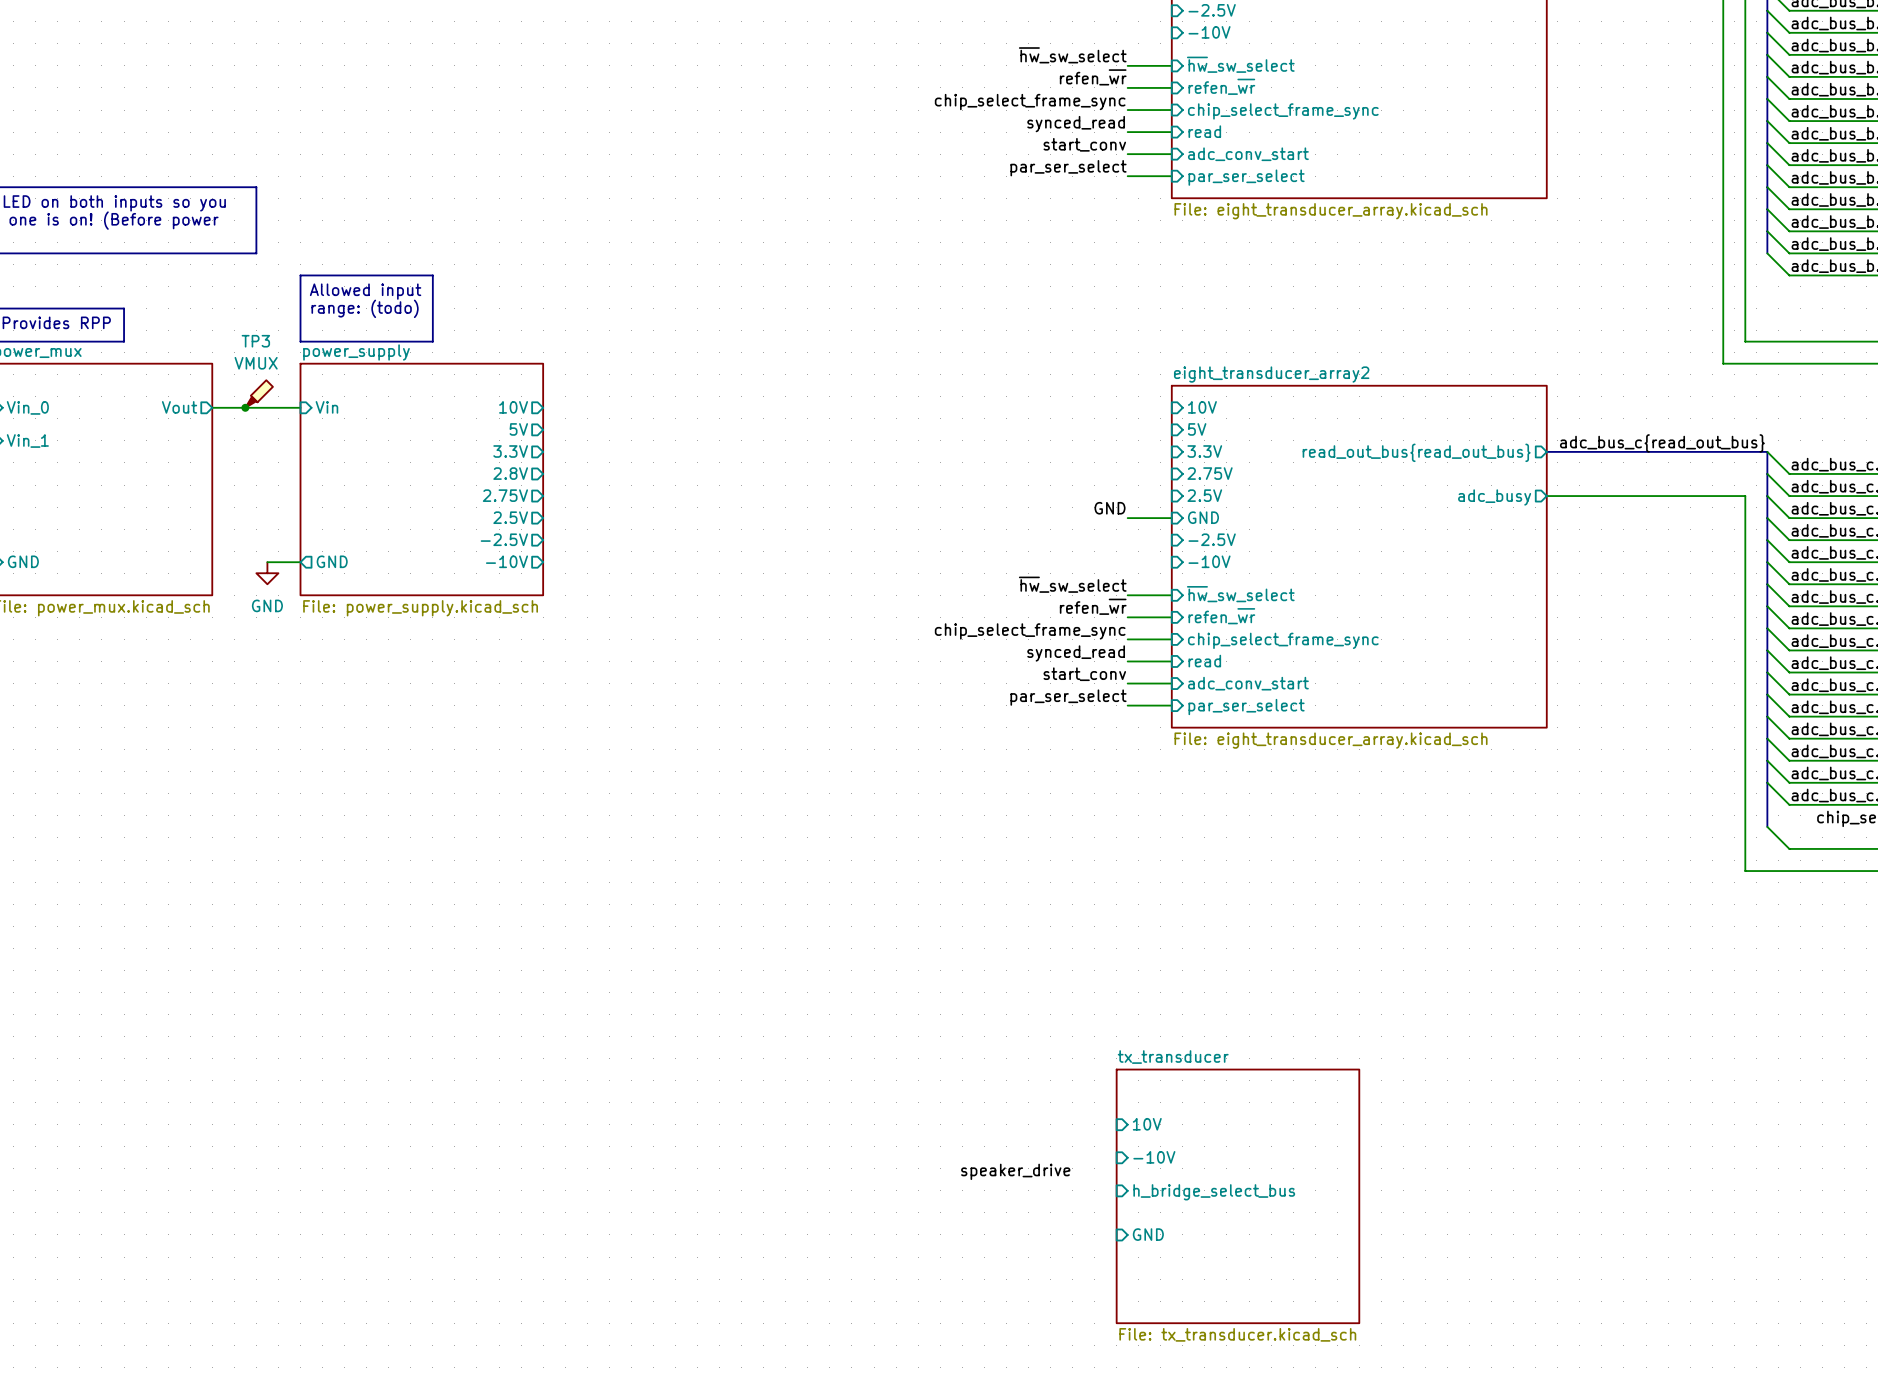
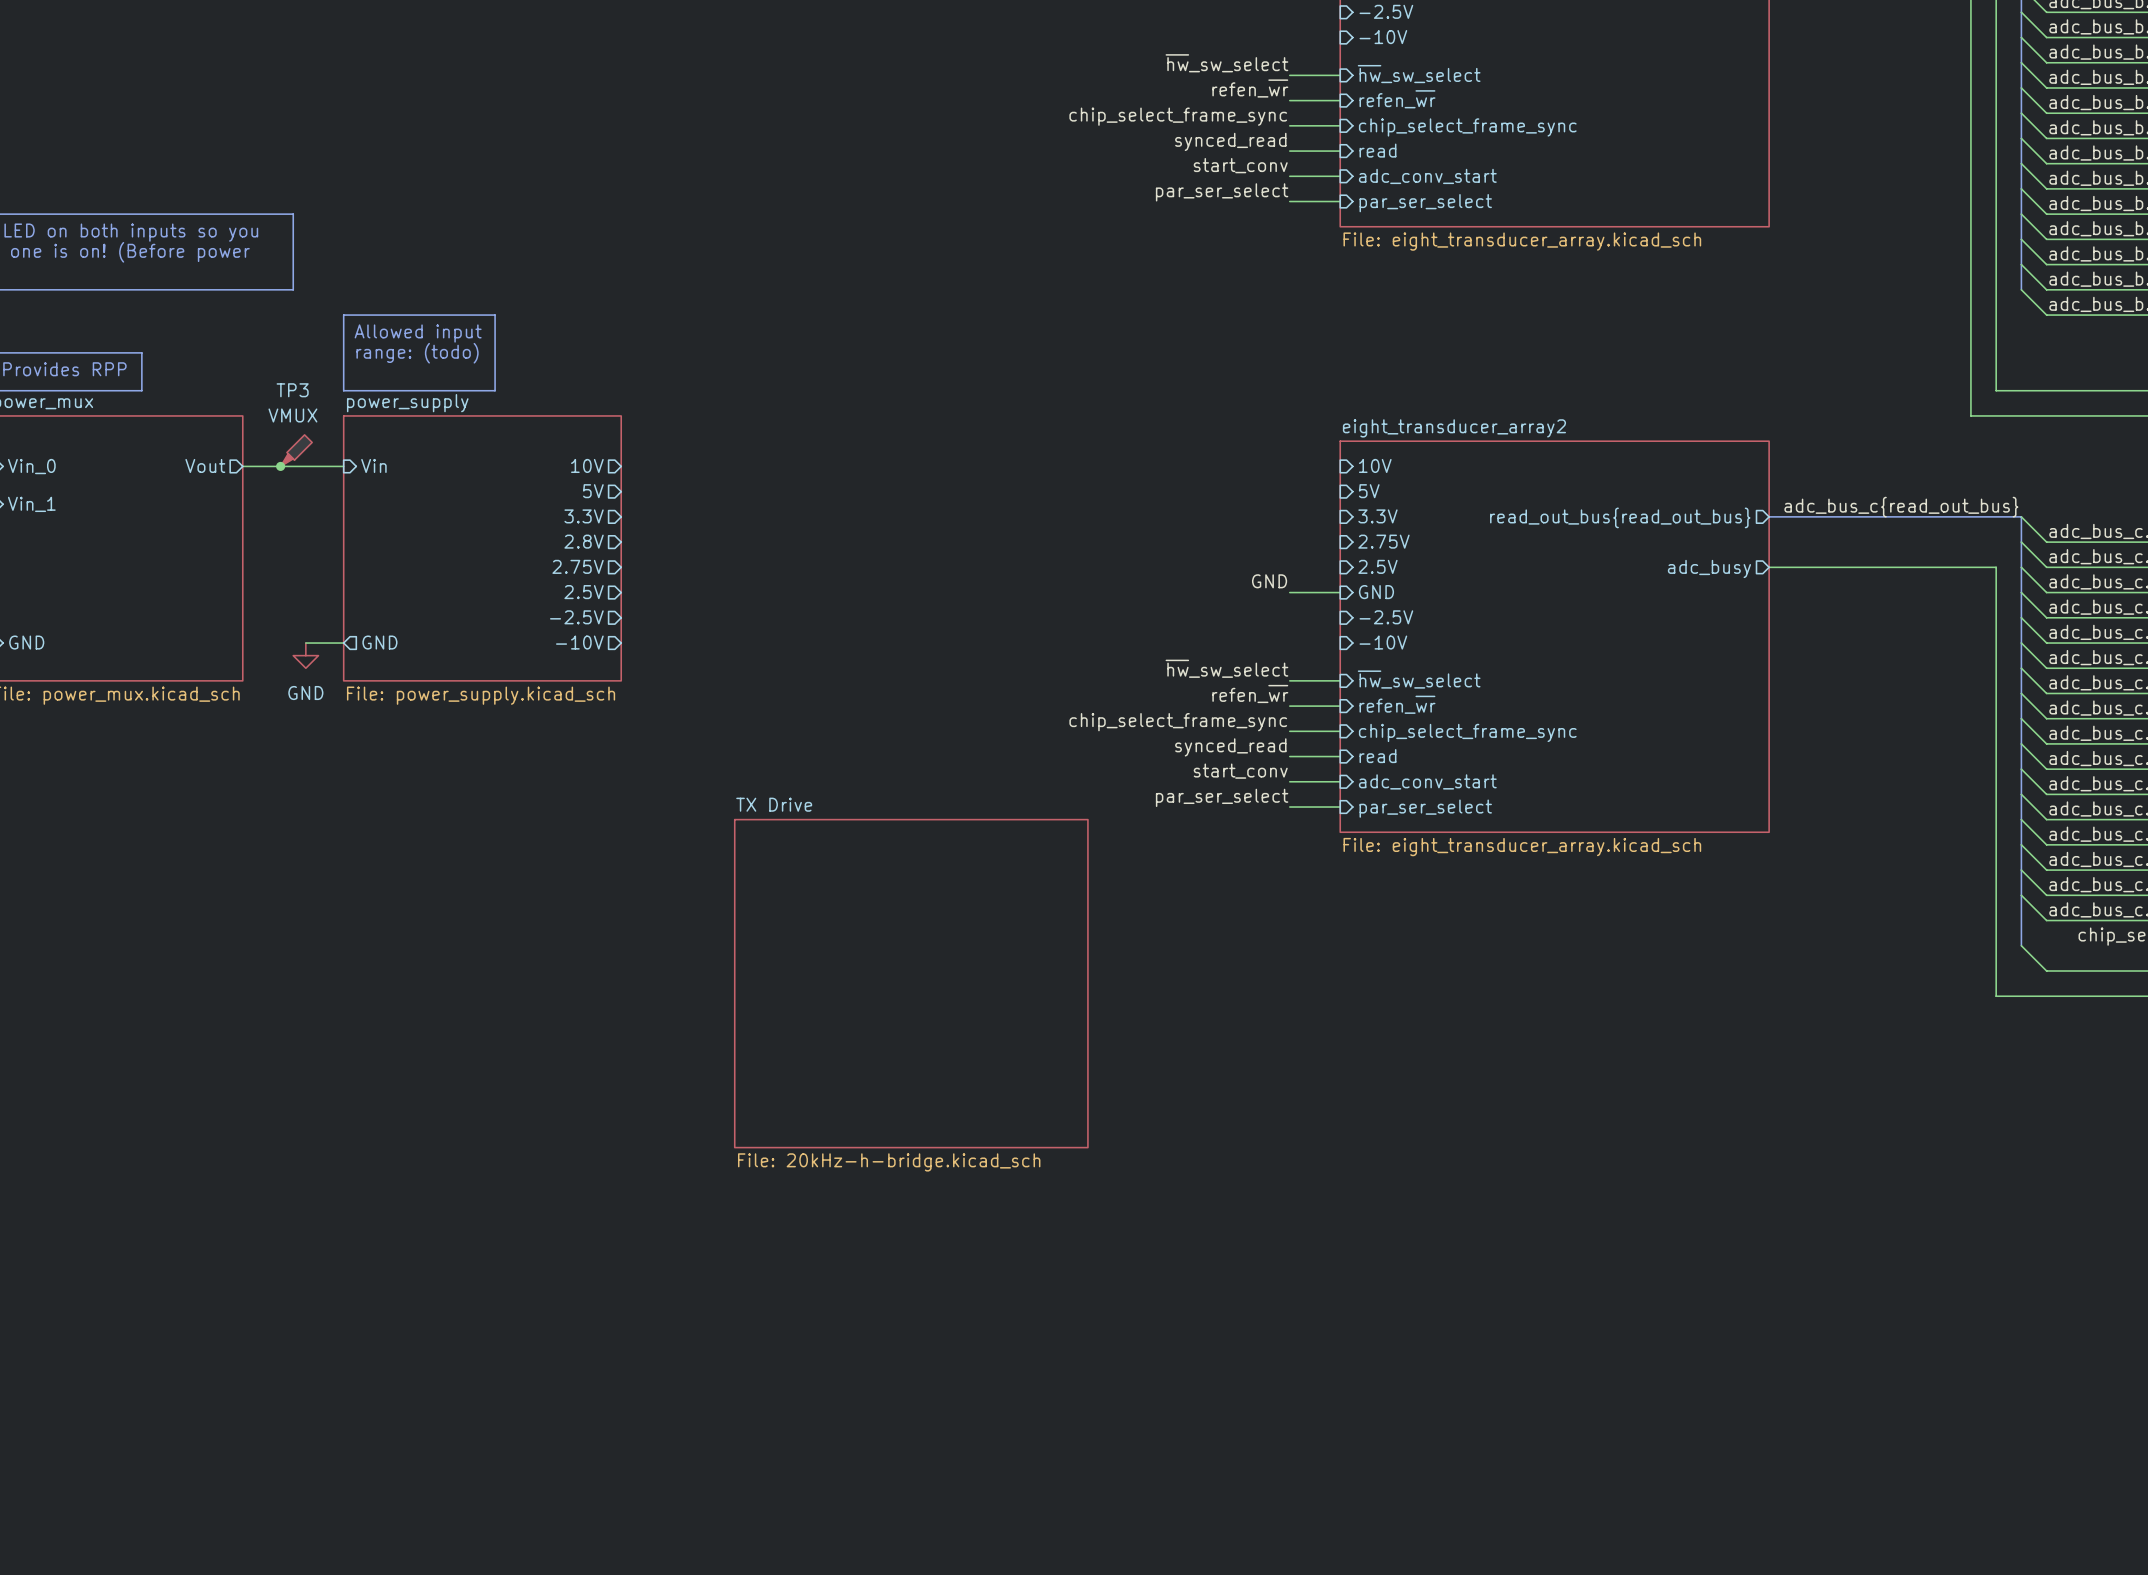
sheet TX Drive: none -> File: 20kHz-h-bridge.kicad_sch (911, 983)
sheet pin: 10V (1147, 1124) -> none
sheet pin: -10V (1154, 1157) -> none
label: speaker_drive (1015, 1171) -> none
sheet pin: h_bridge_select_bus (1214, 1192) -> none
sheet tx_transducer: File: tx_transducer.kicad_sch (1237, 1196) -> none
sheet pin: GND (1148, 1234) -> none

